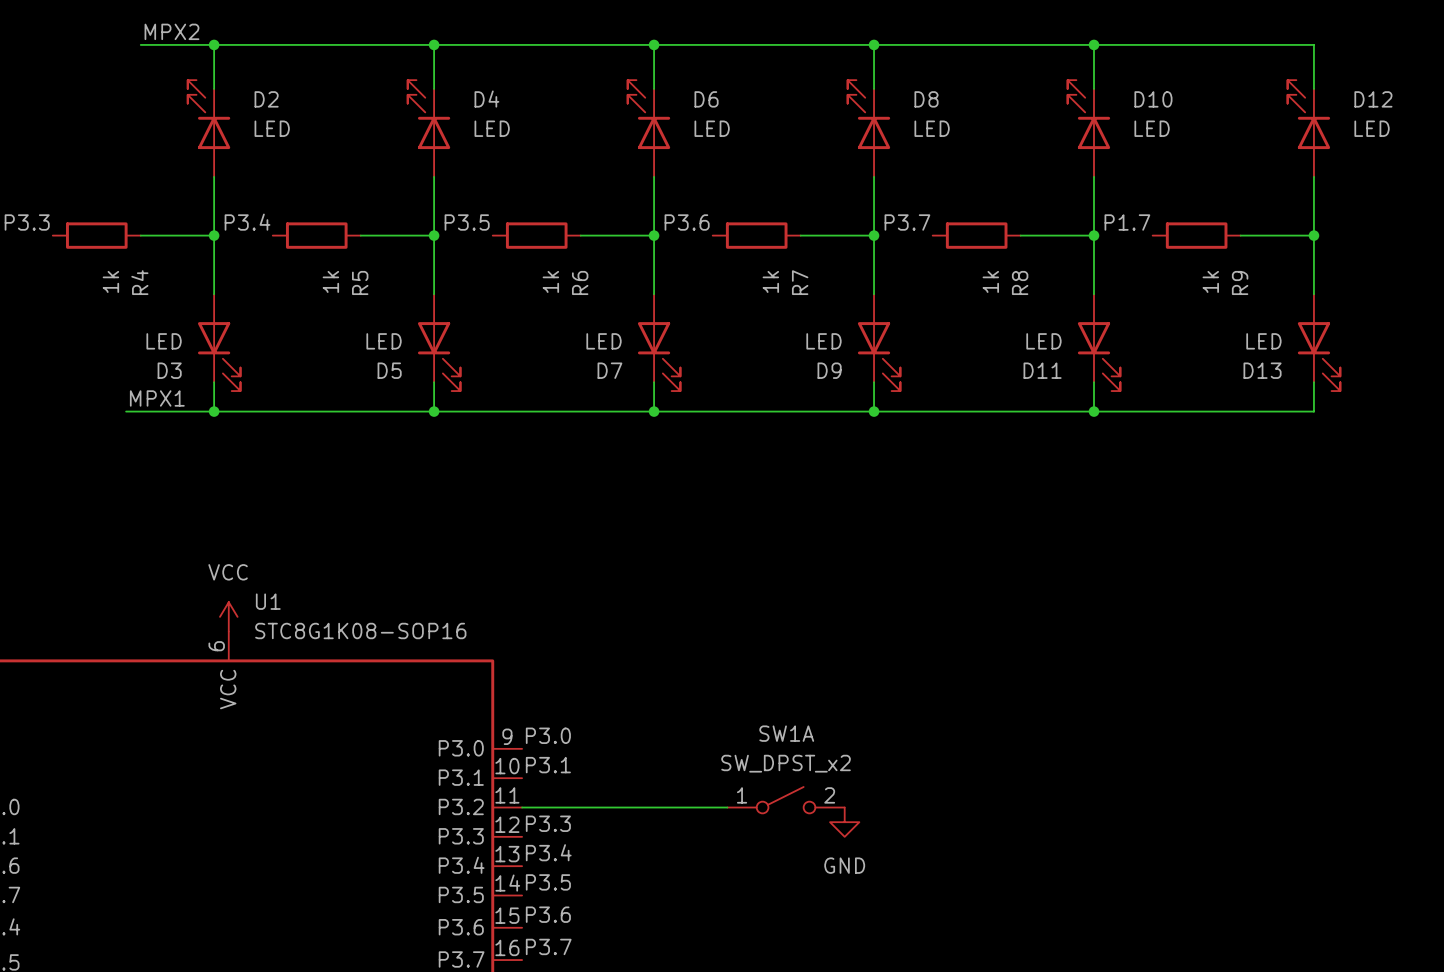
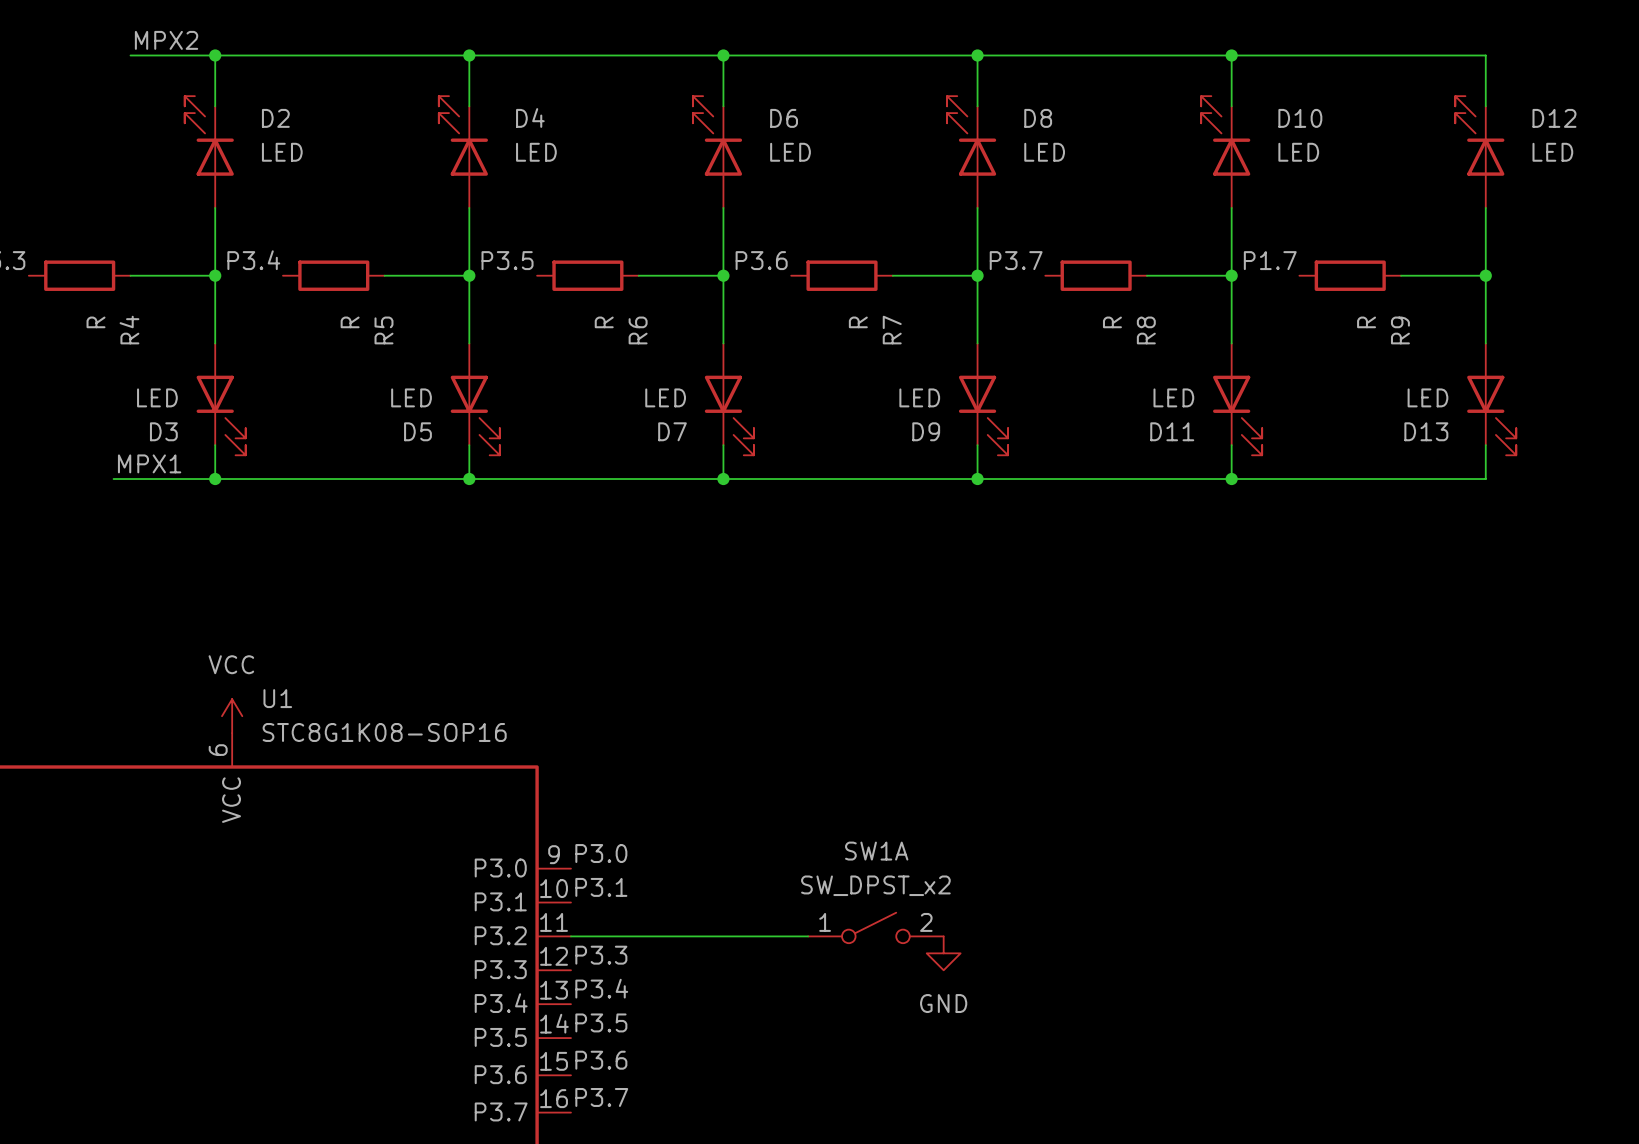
R4 value: 1k (110, 281) -> R (96, 322)
R5 value: 1k (330, 281) -> R (350, 322)
R6 value: 1k (550, 281) -> R (604, 322)
R7 value: 1k (770, 281) -> R (858, 322)
R8 value: 1k (990, 281) -> R (1112, 322)
R9 value: 1k (1210, 281) -> R (1366, 322)

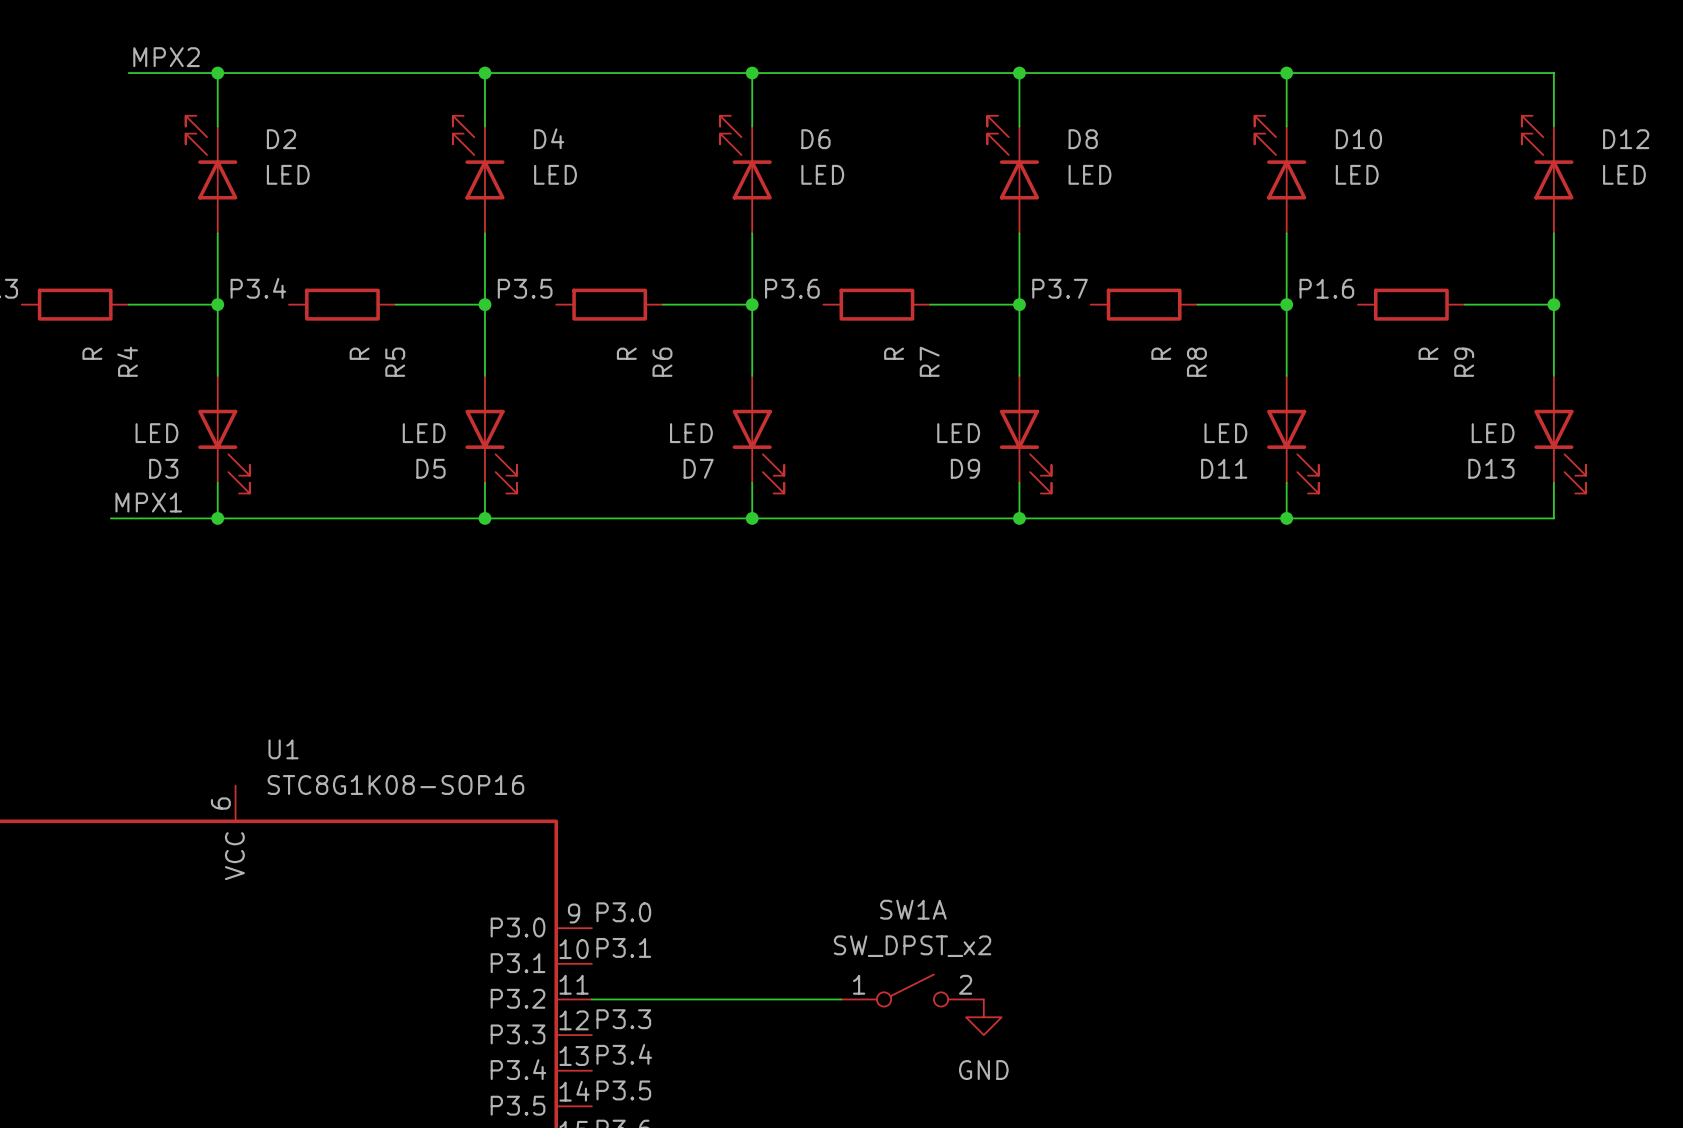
label: P1.7 (1270, 260) -> P1.6 (1326, 288)
power symbol: VCC (232, 716) -> none

